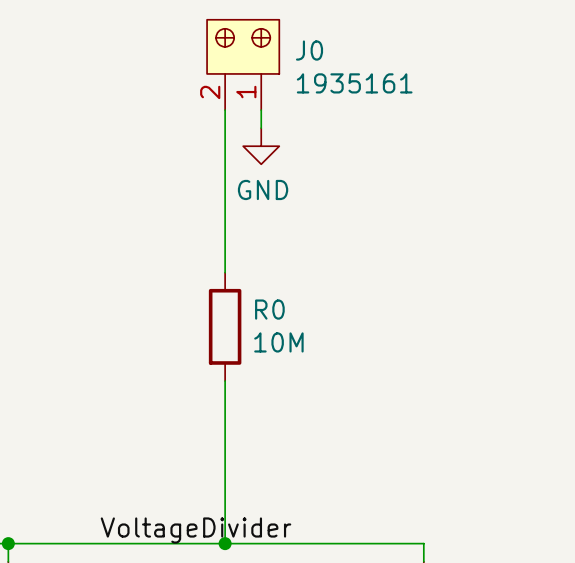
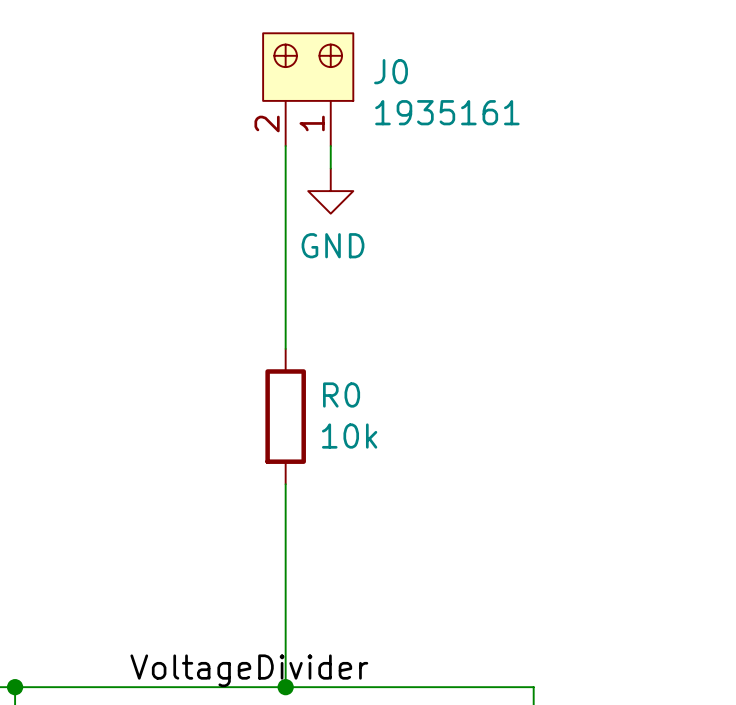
R0 value: 10M (278, 342) -> 10k (349, 436)

